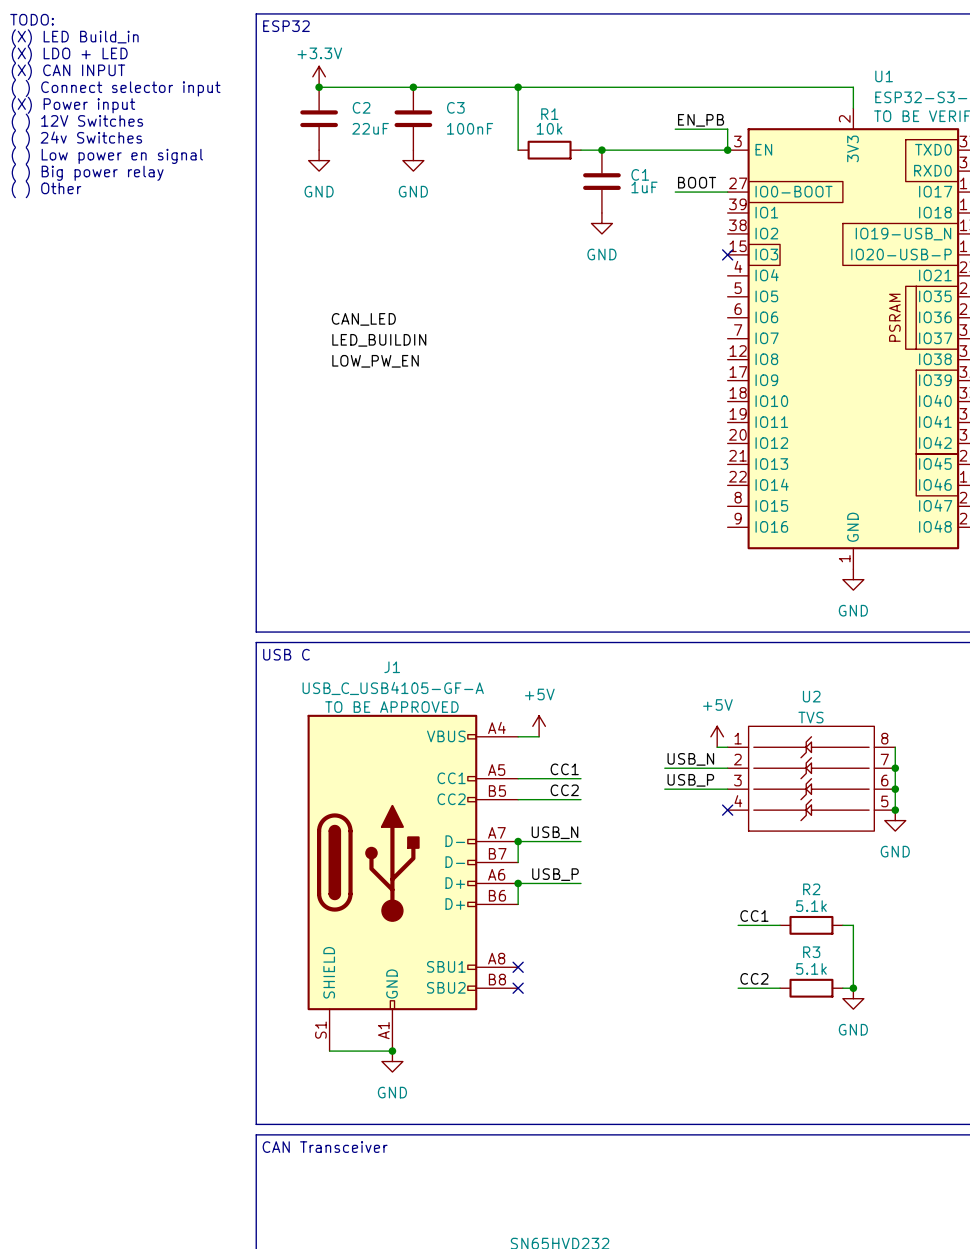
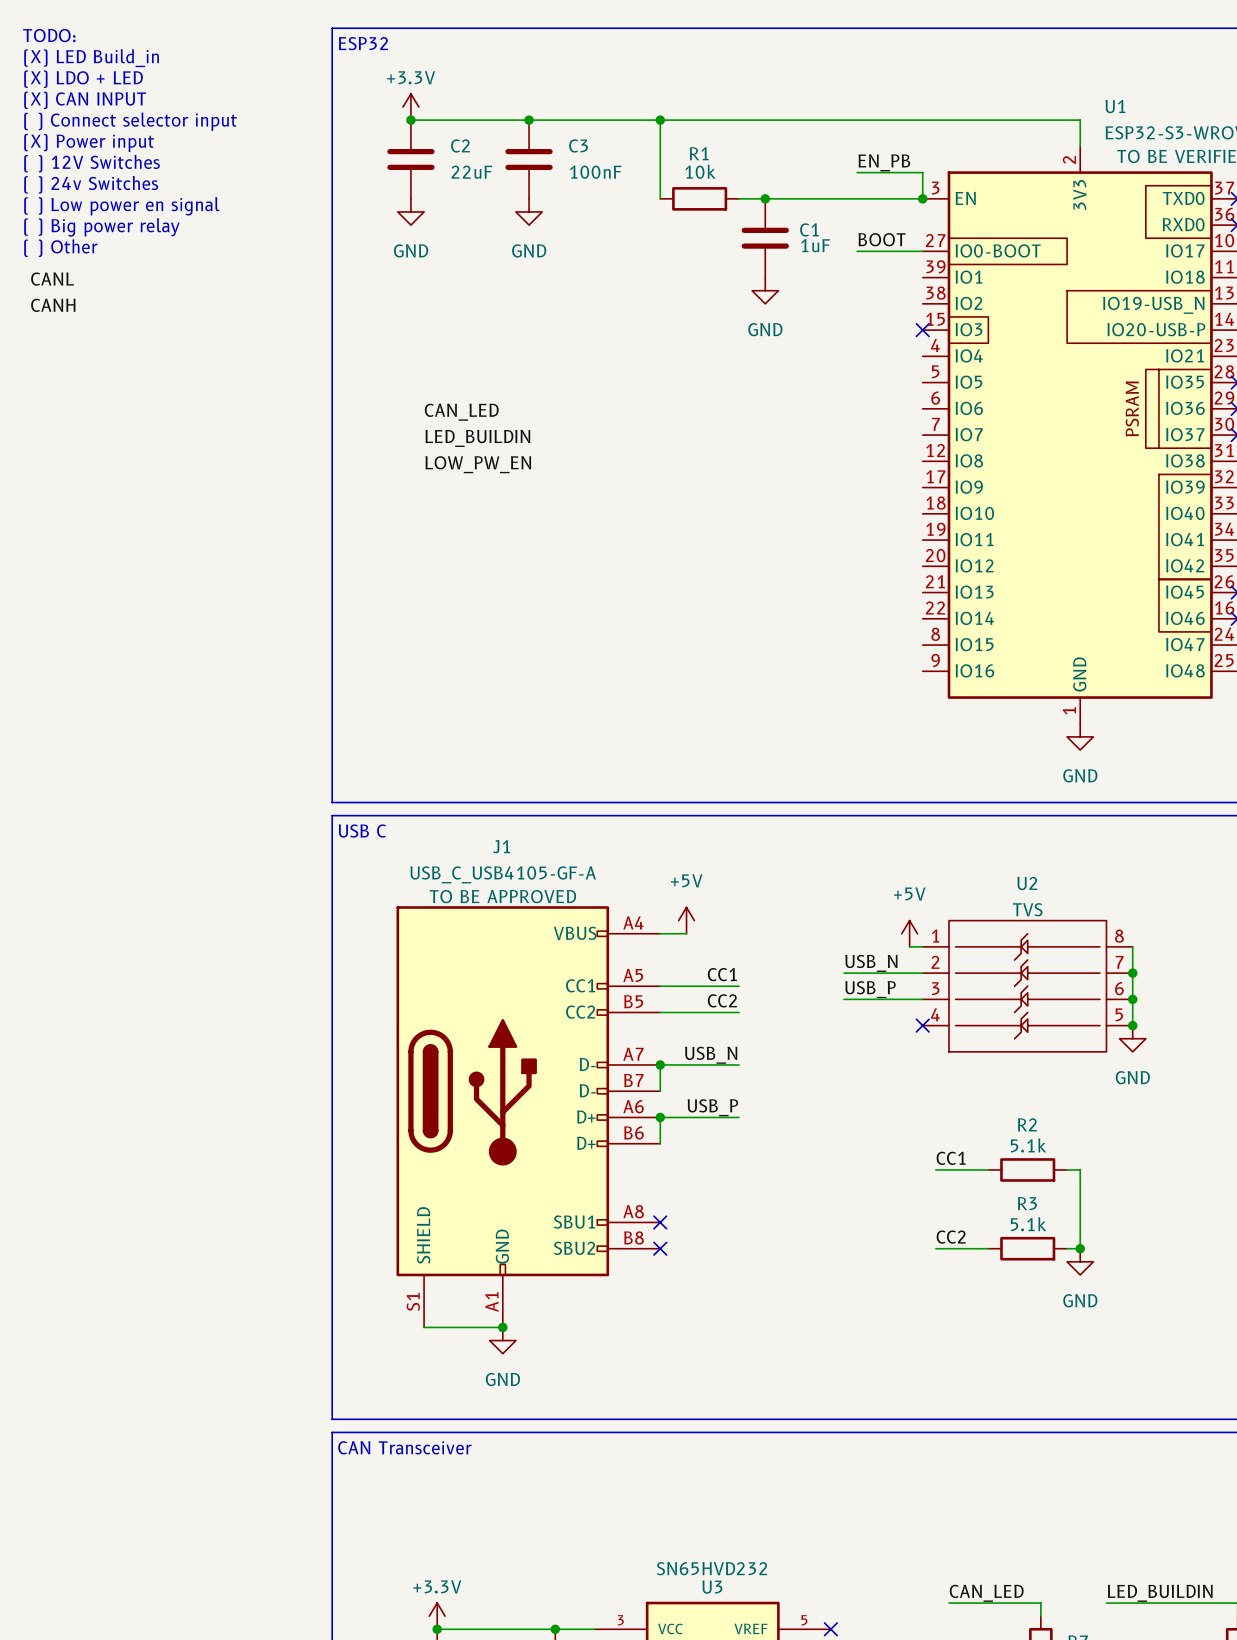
label: none -> CANL (52, 279)
label: none -> CANH (53, 305)

